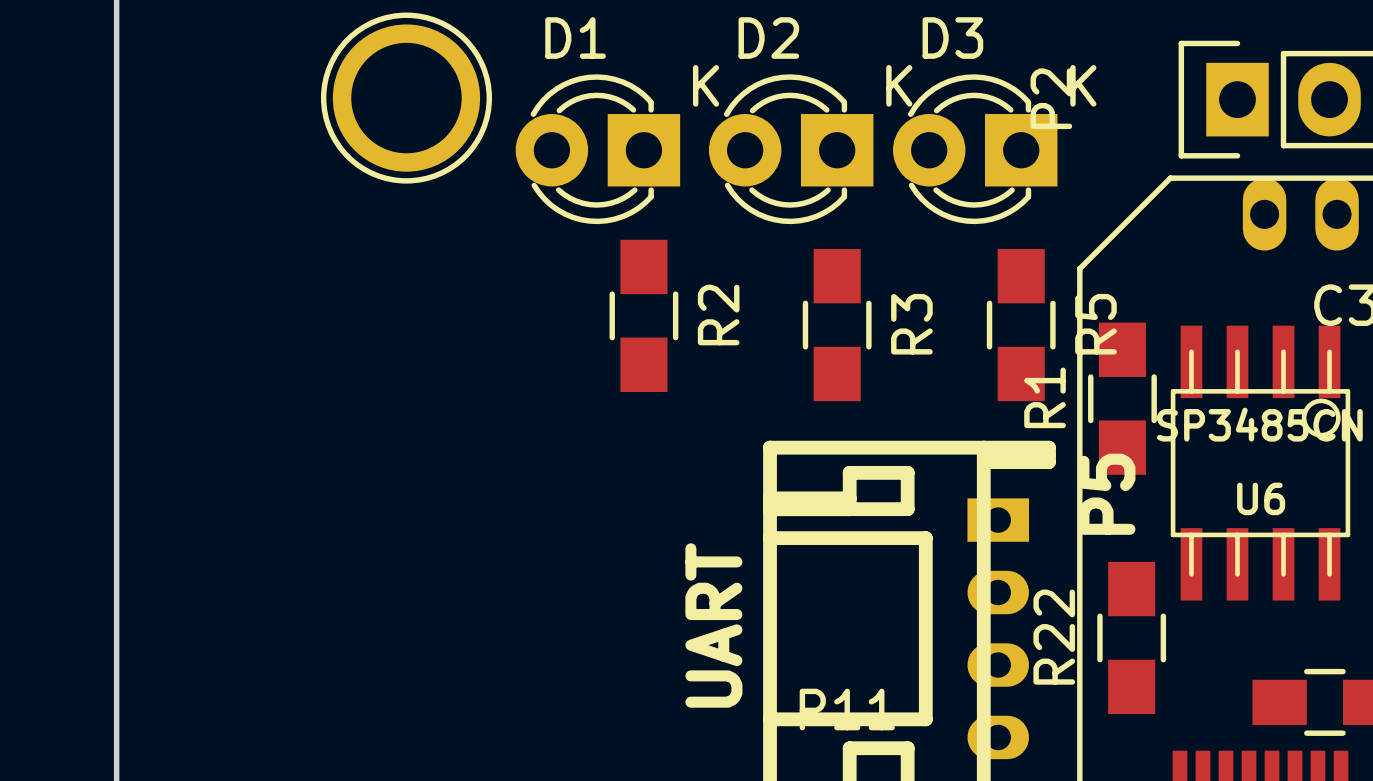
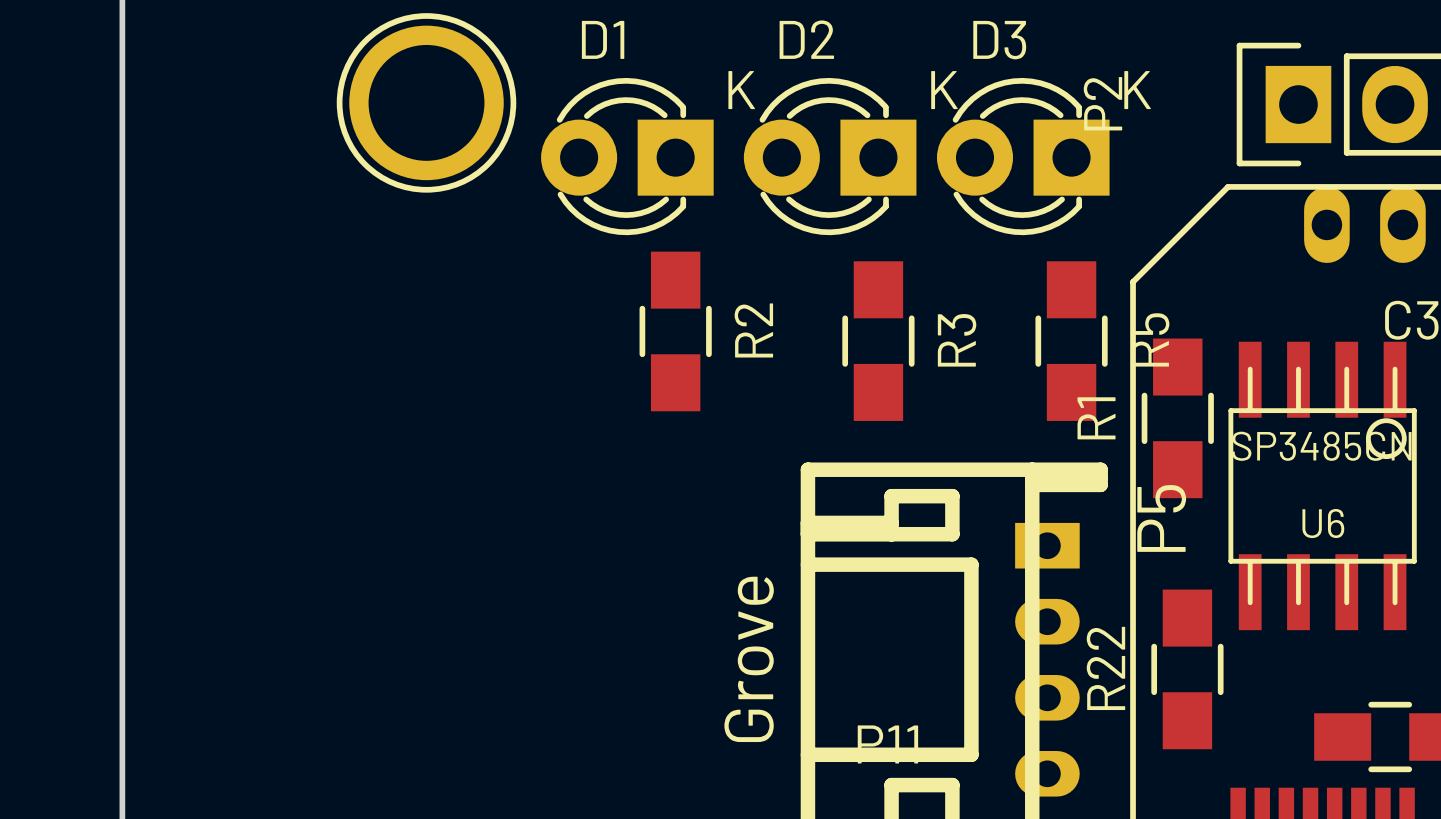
P5 value: UART (713, 625) -> Grove (749, 659)

